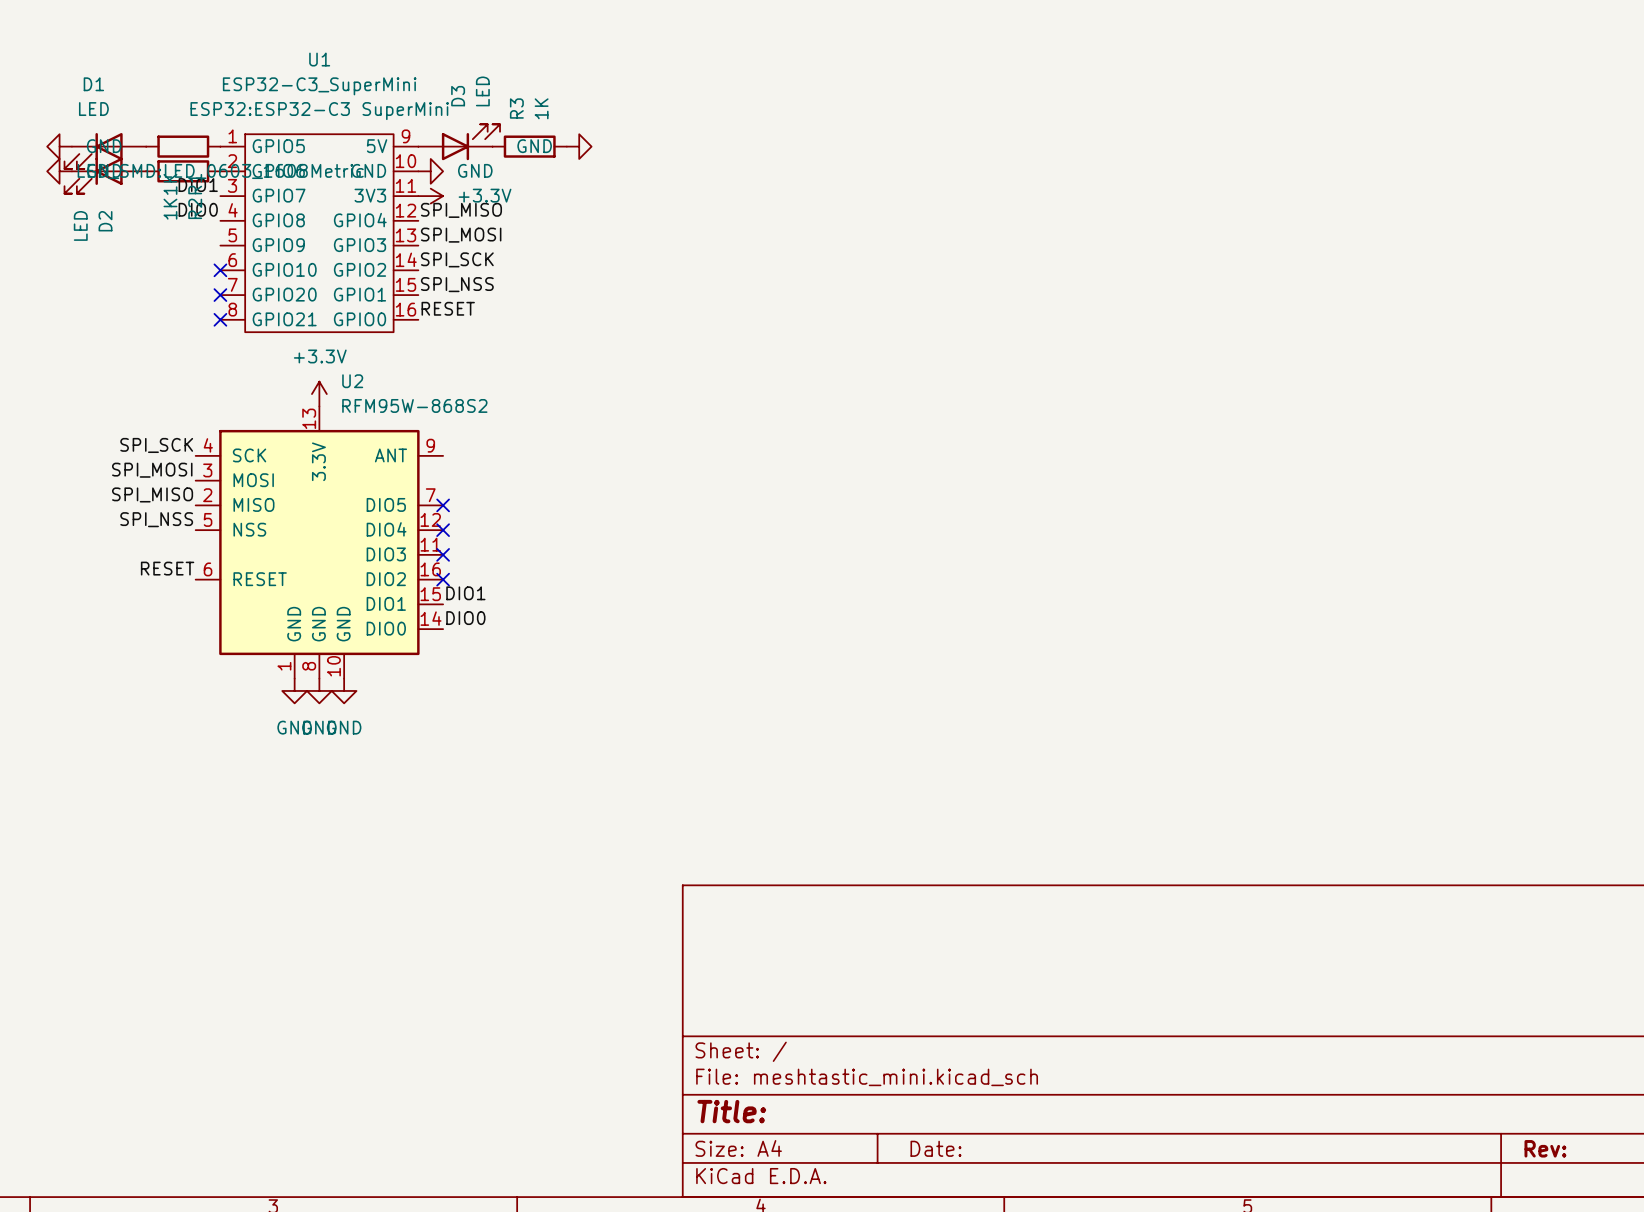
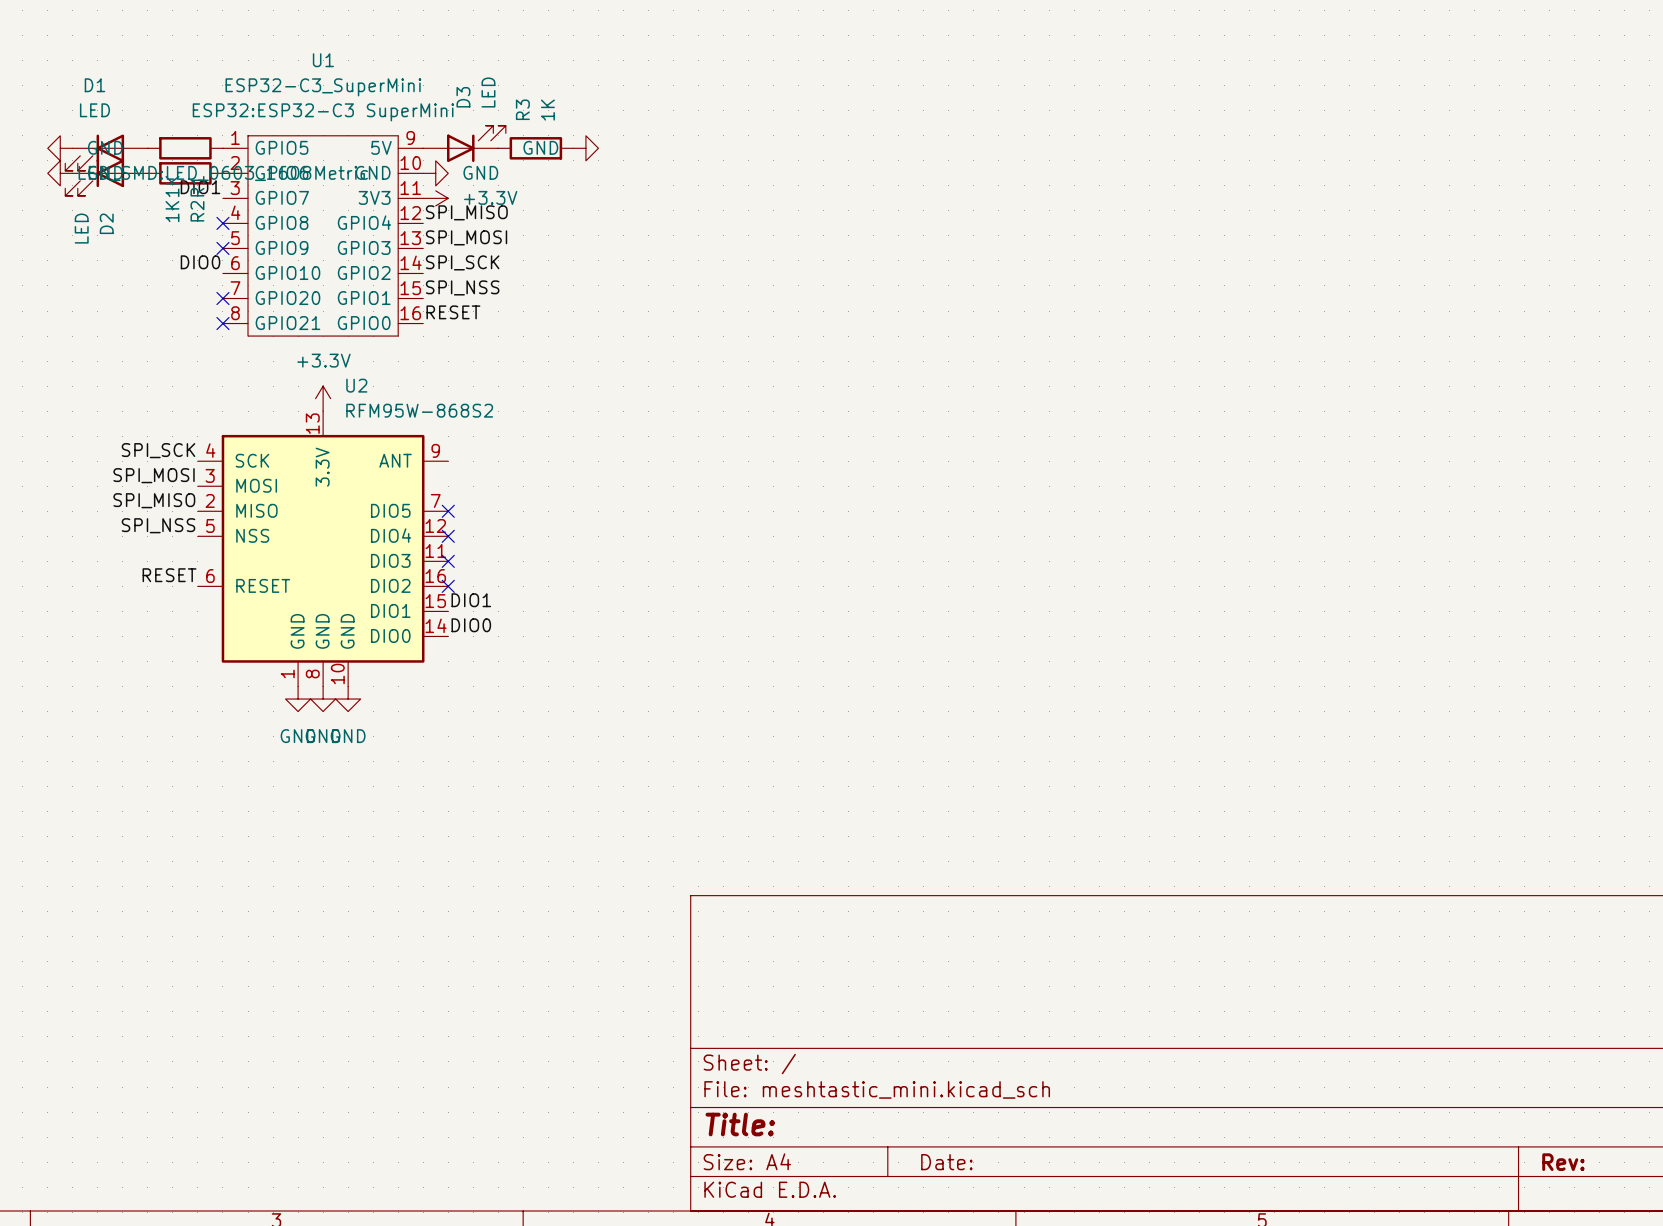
label position: DIO0 (198, 209) -> DIO0 (200, 262)
no-connect mark: none -> (222, 223)
no-connect mark: none -> (222, 248)
no-connect mark: (220, 270) -> none

